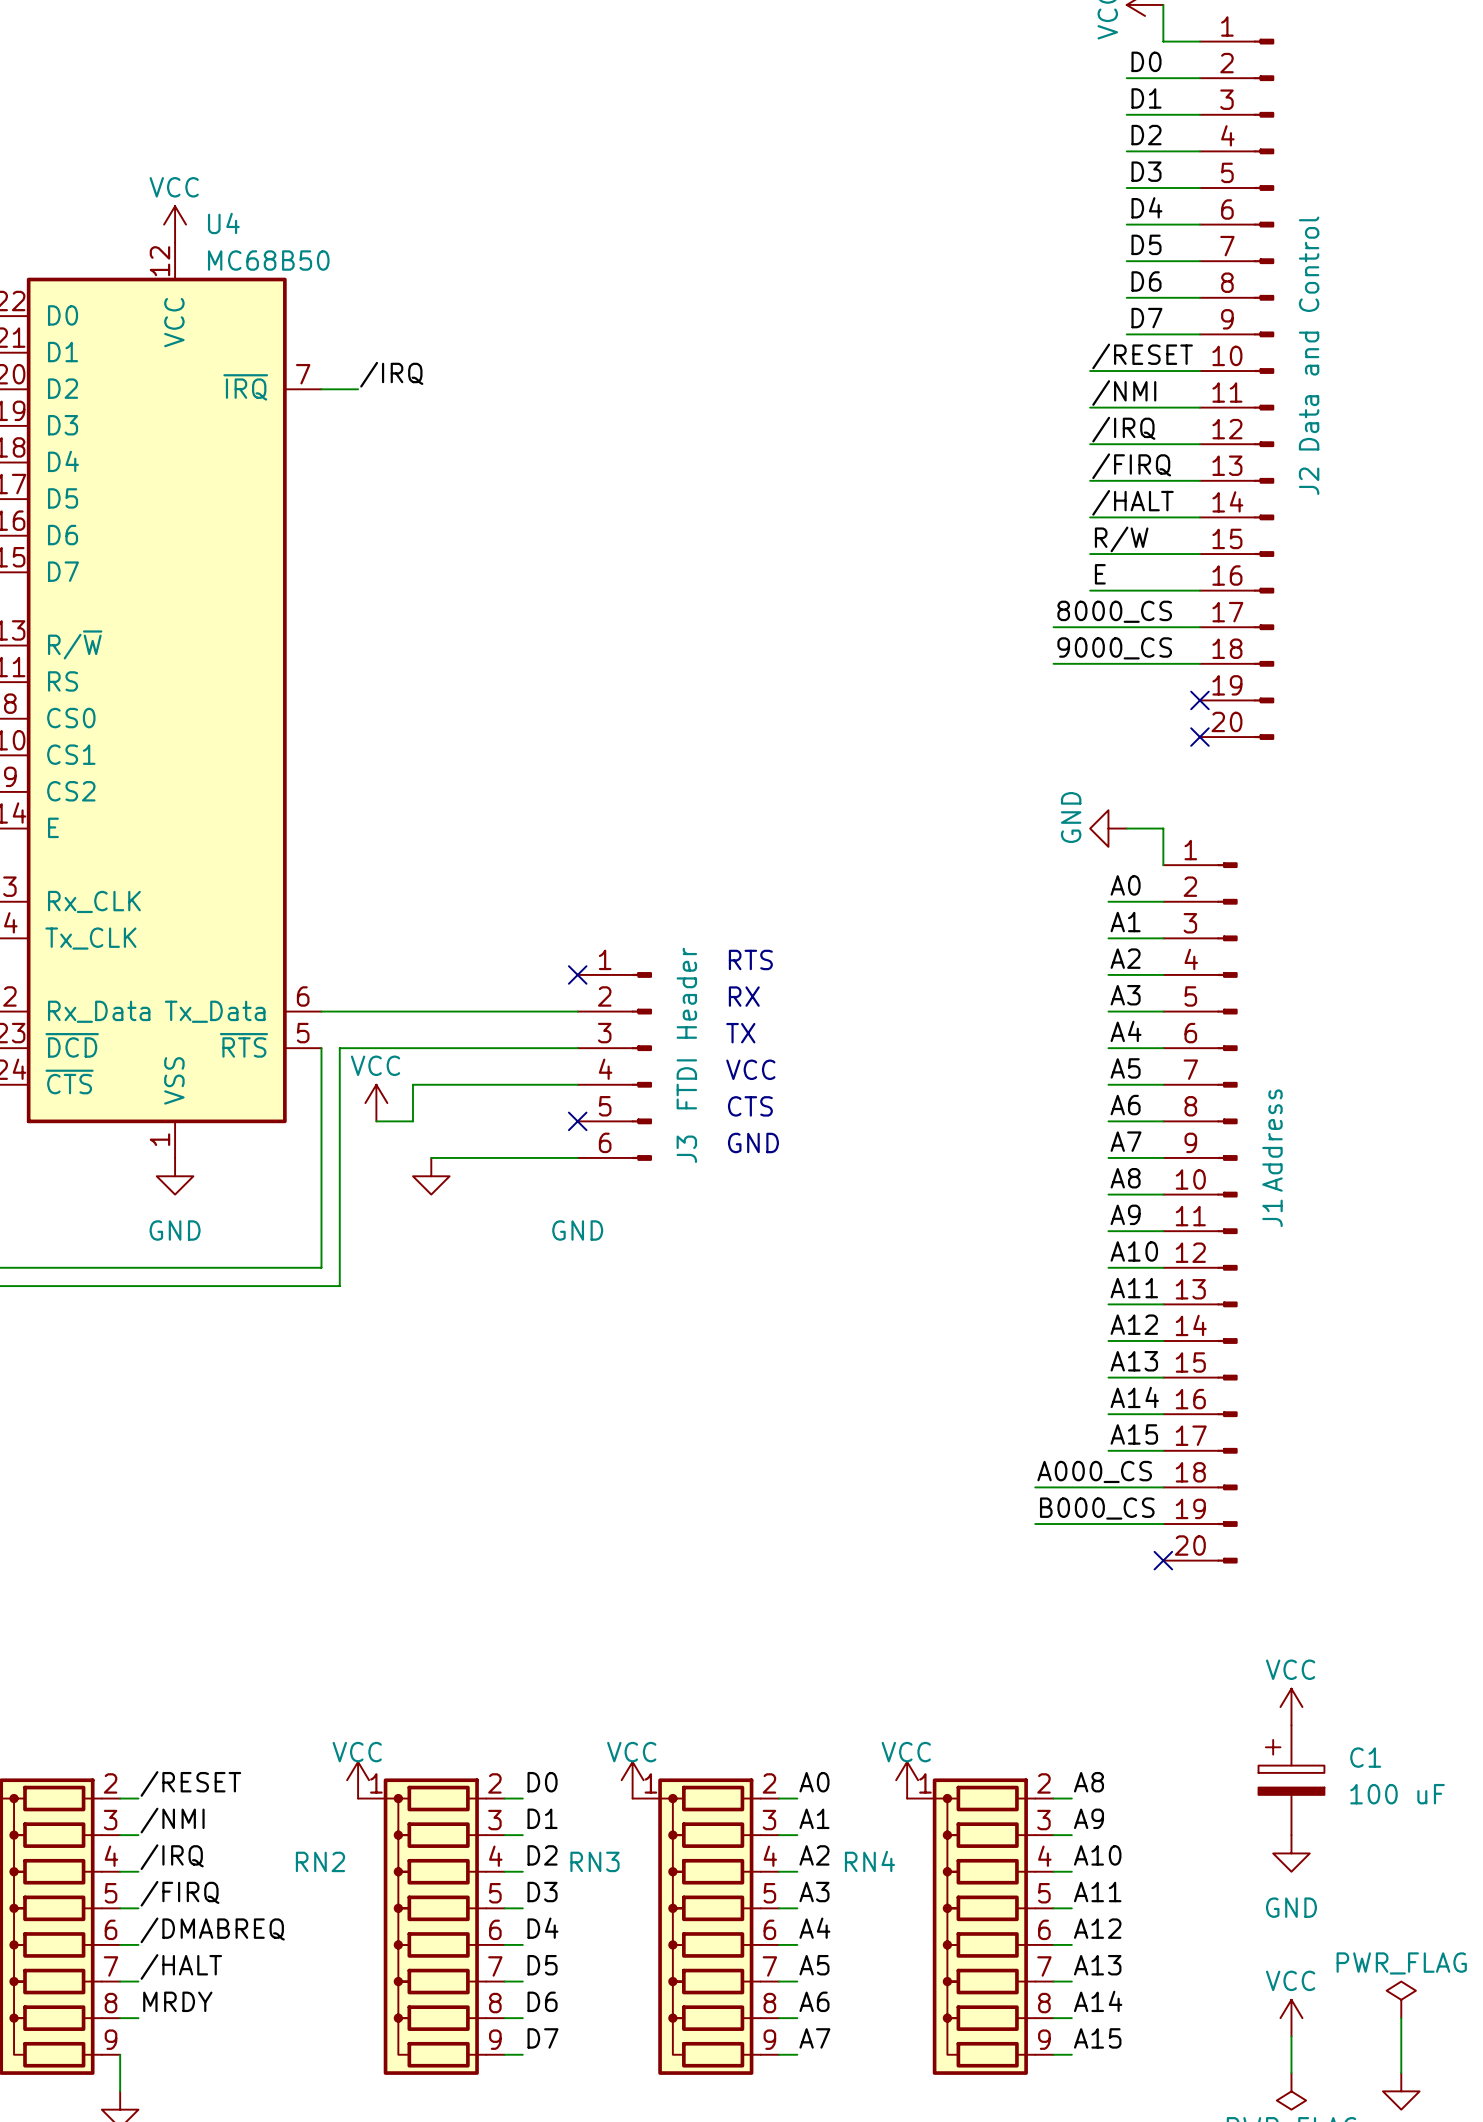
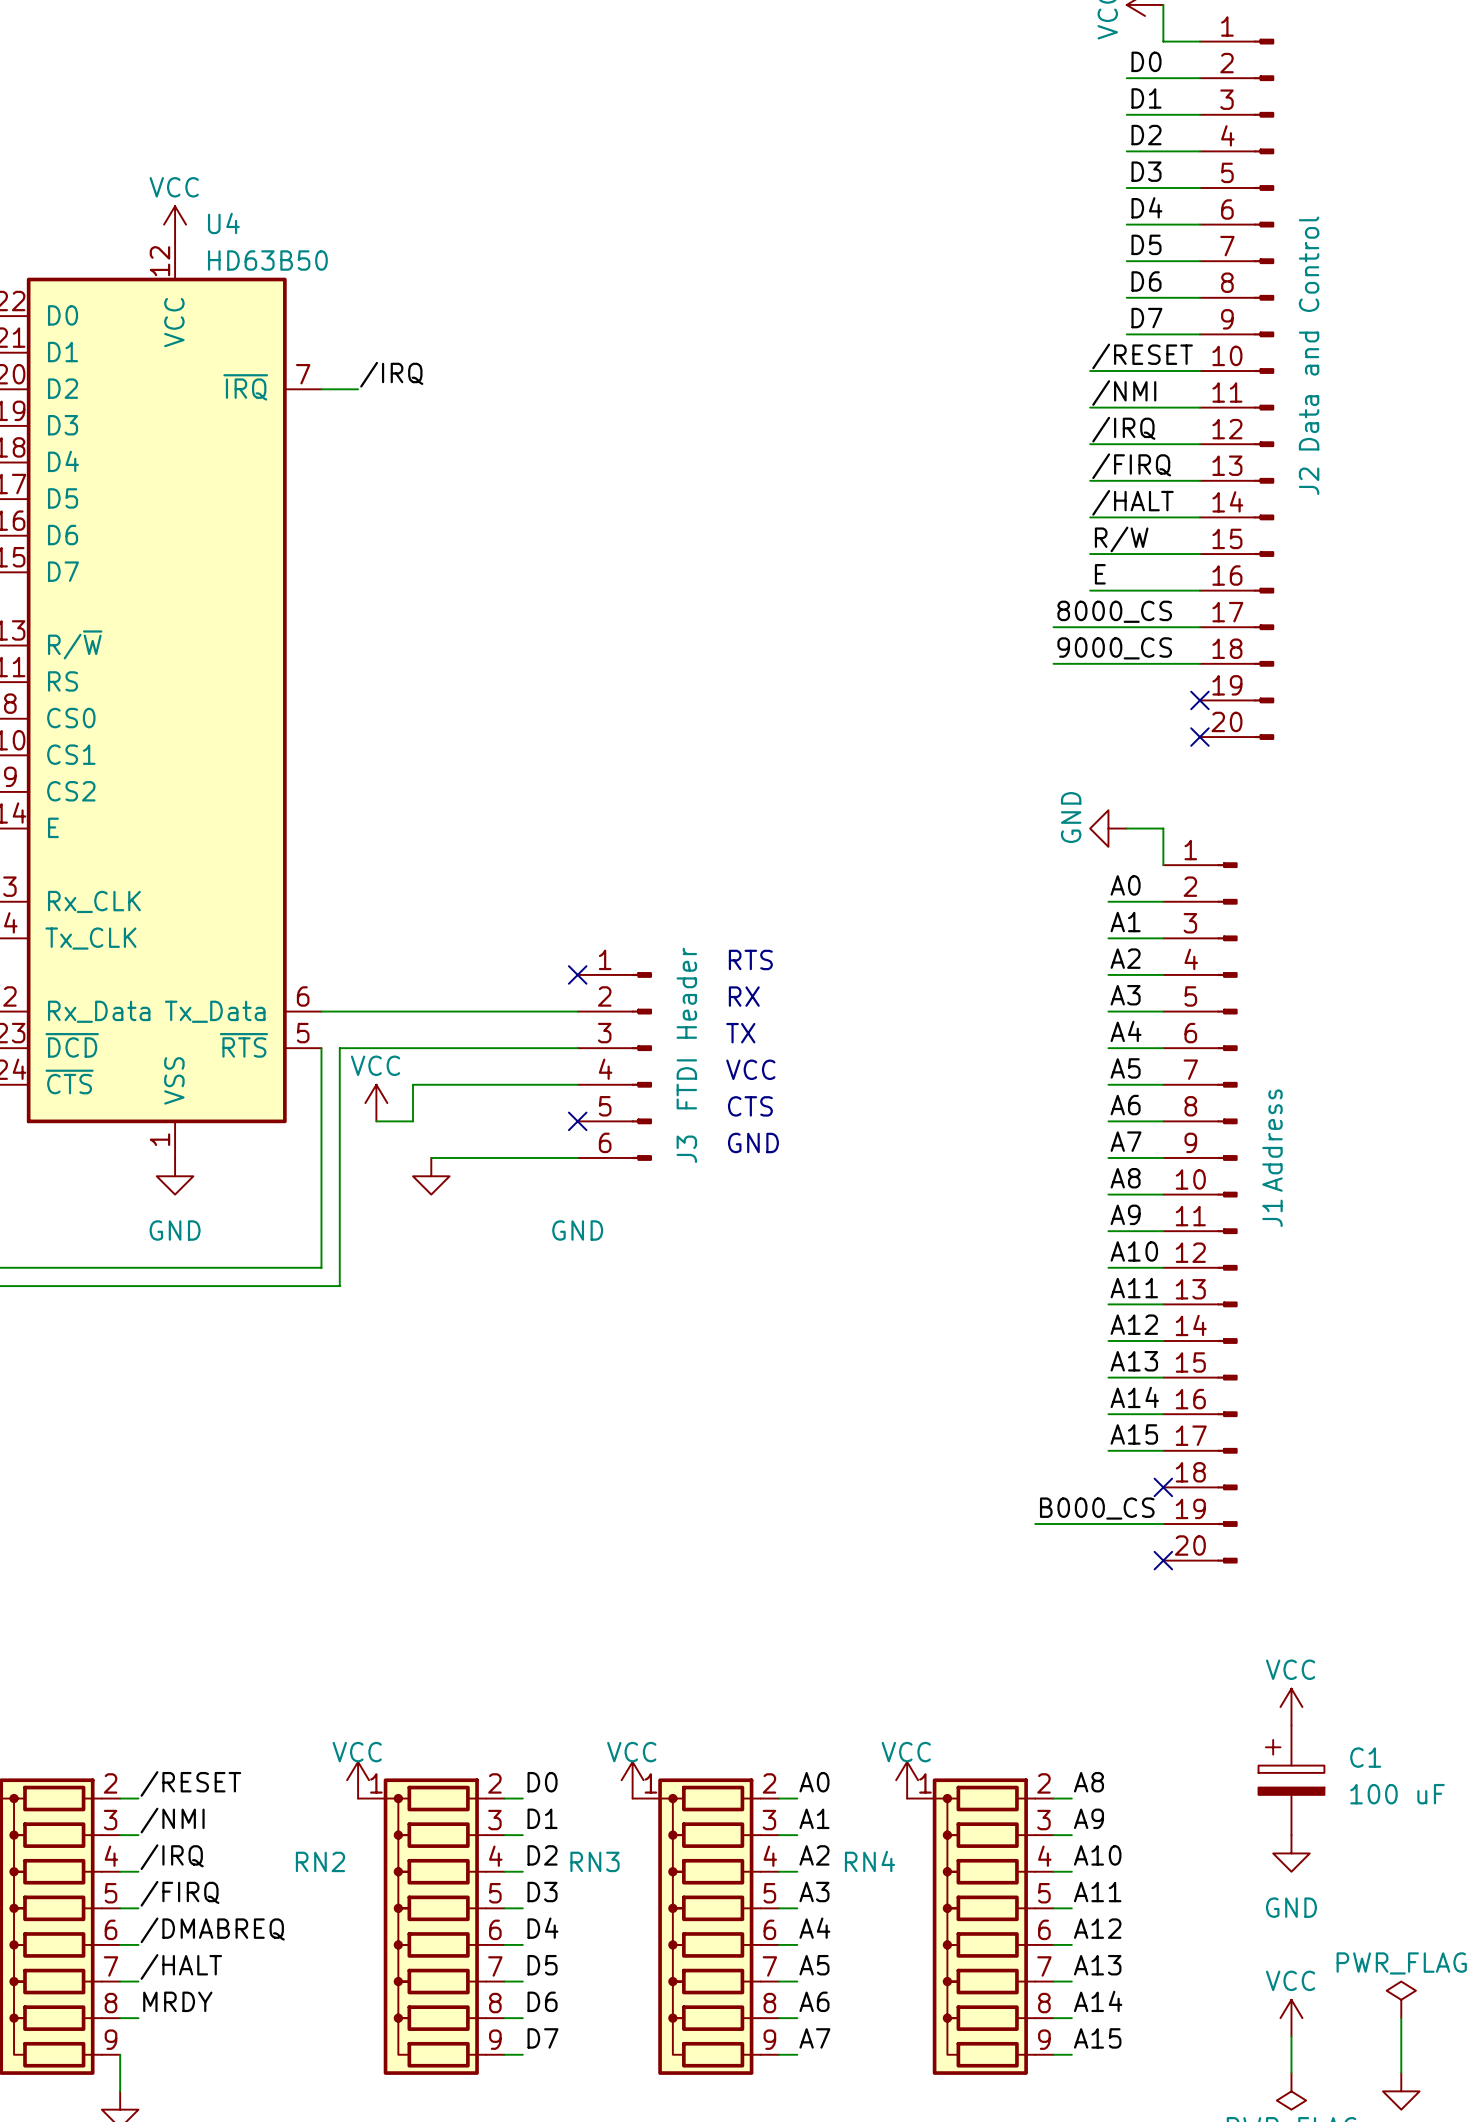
U4 value: MC68B50 (268, 260) -> HD63B50 (267, 260)
label: A000_CS (1094, 1471) -> none
wire: (1035, 1487) (1163, 1487) -> none
no-connect mark: none -> (1163, 1487)

